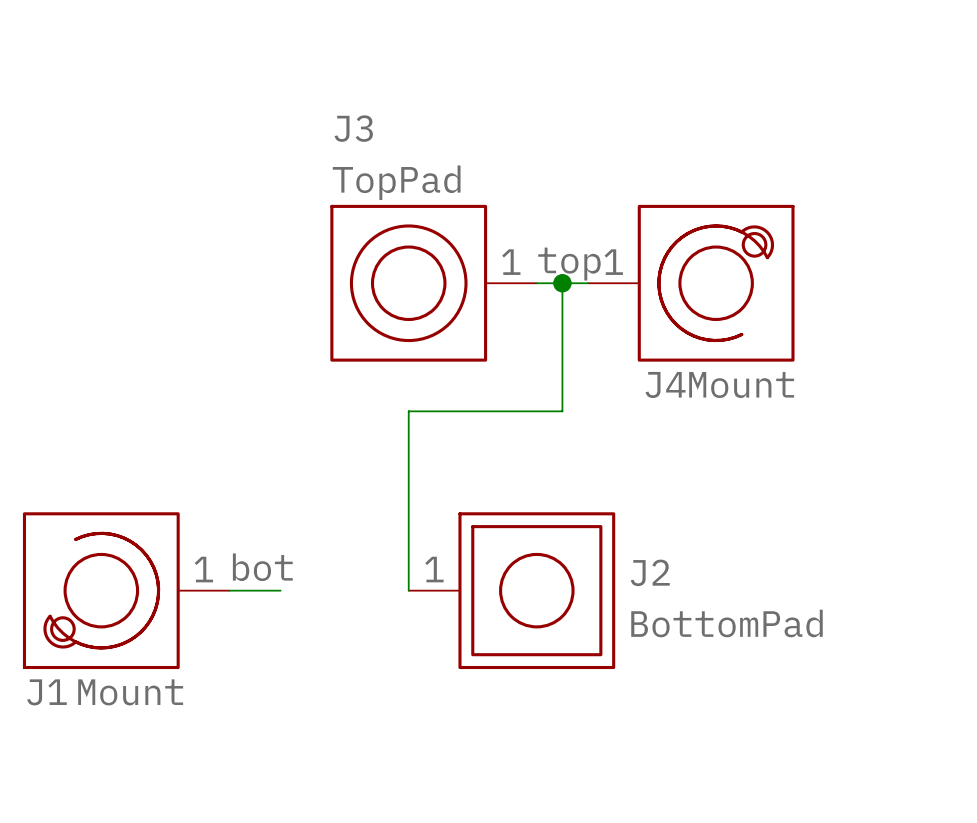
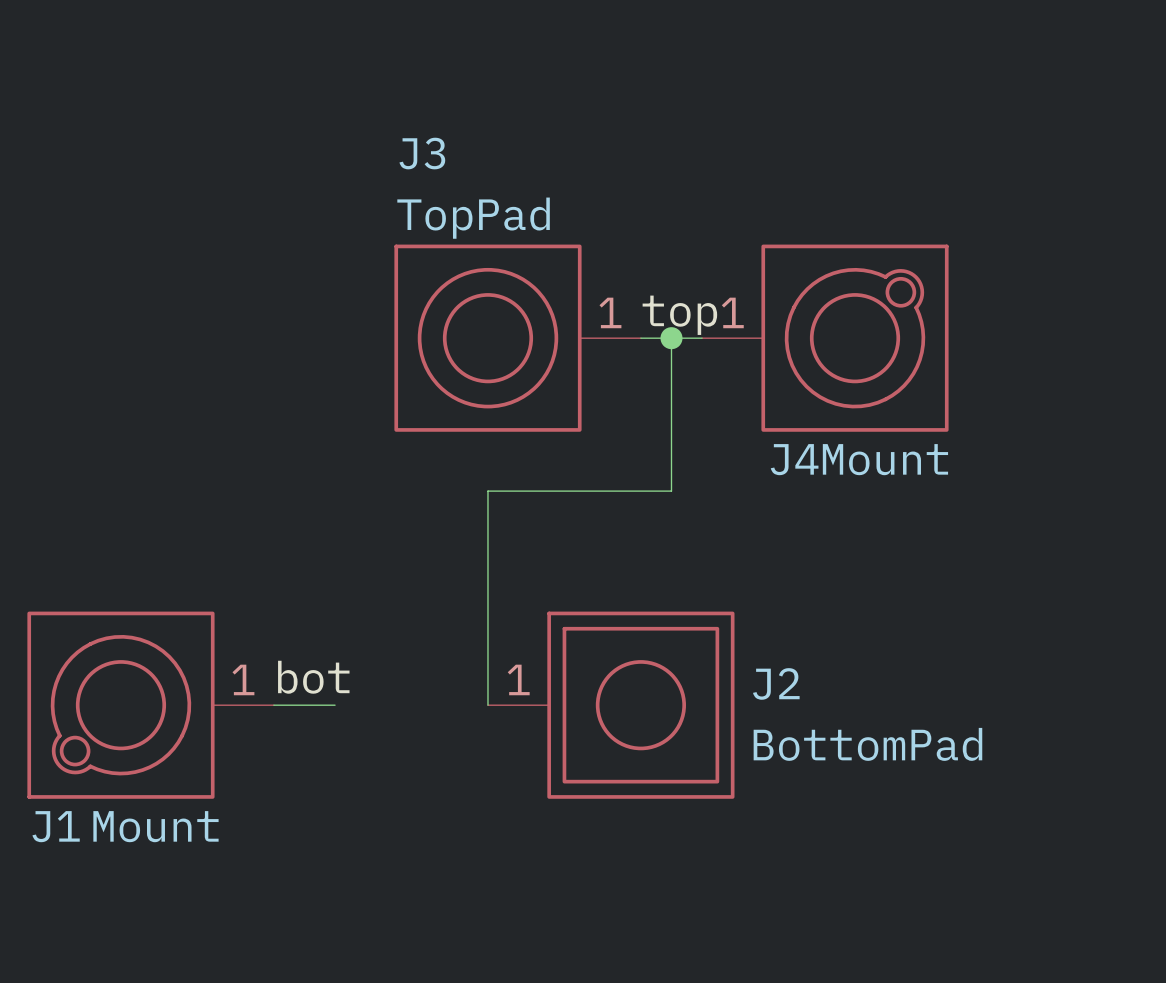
J4 symbol: [588, 204, 795, 362] -> [702, 244, 949, 432]
J1 symbol: [22, 512, 230, 670] -> [27, 611, 274, 799]

